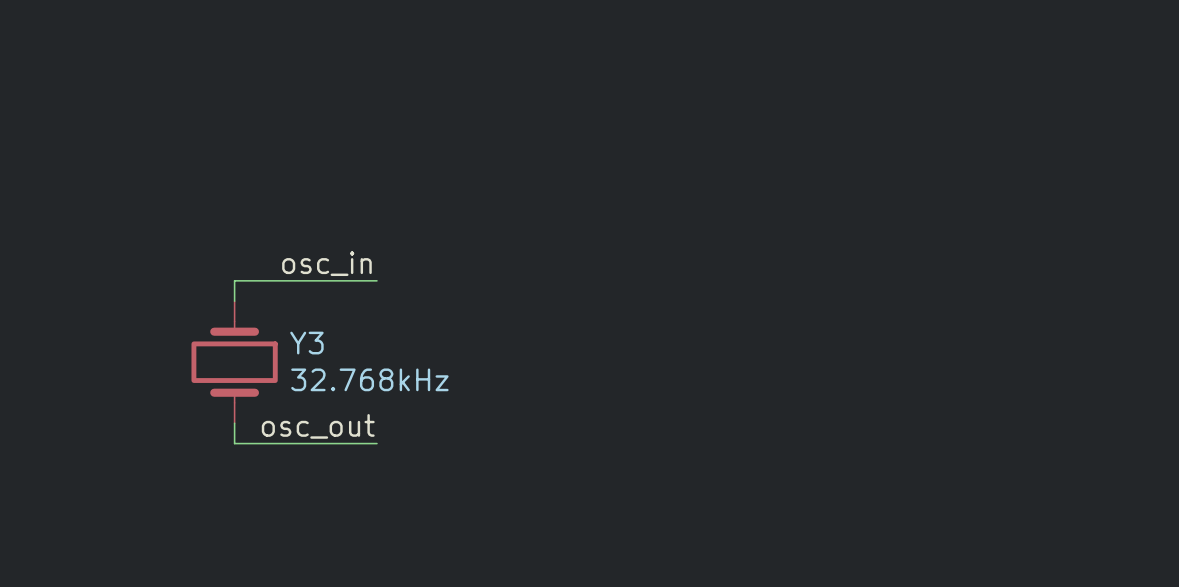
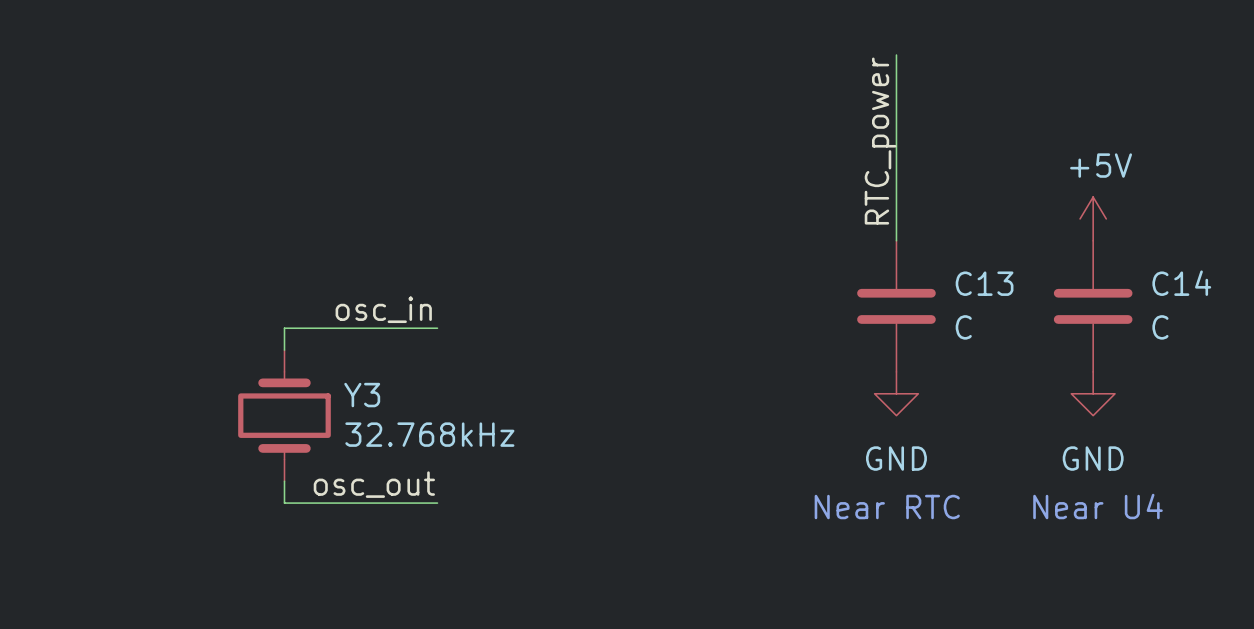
wire: none -> (896, 55) (896, 240)
label: none -> RTC_power (880, 141)
power symbol: none -> +5V (1093, 218)
C13: none -> C (896, 306)
C14: none -> C (1093, 306)
power symbol: none -> GND (896, 393)
power symbol: none -> GND (1093, 393)
text: none -> Near U4 (1098, 506)
text: none -> Near RTC (887, 507)

